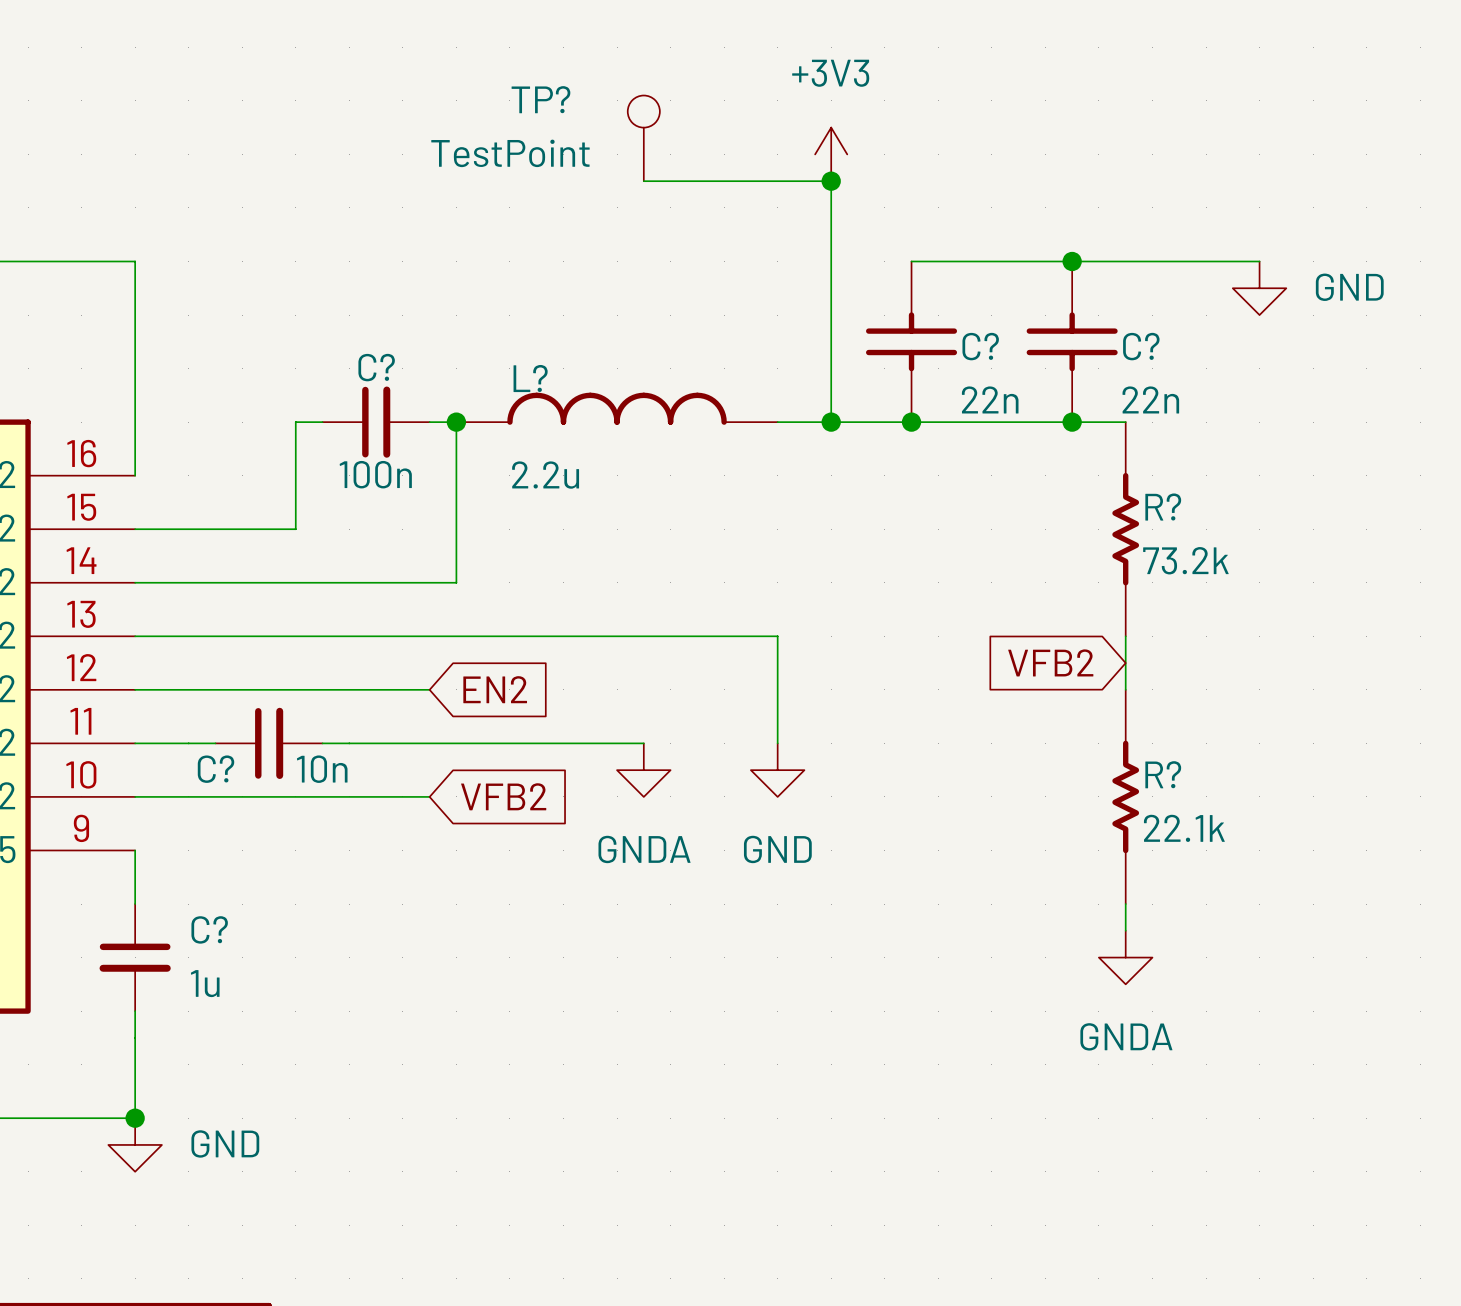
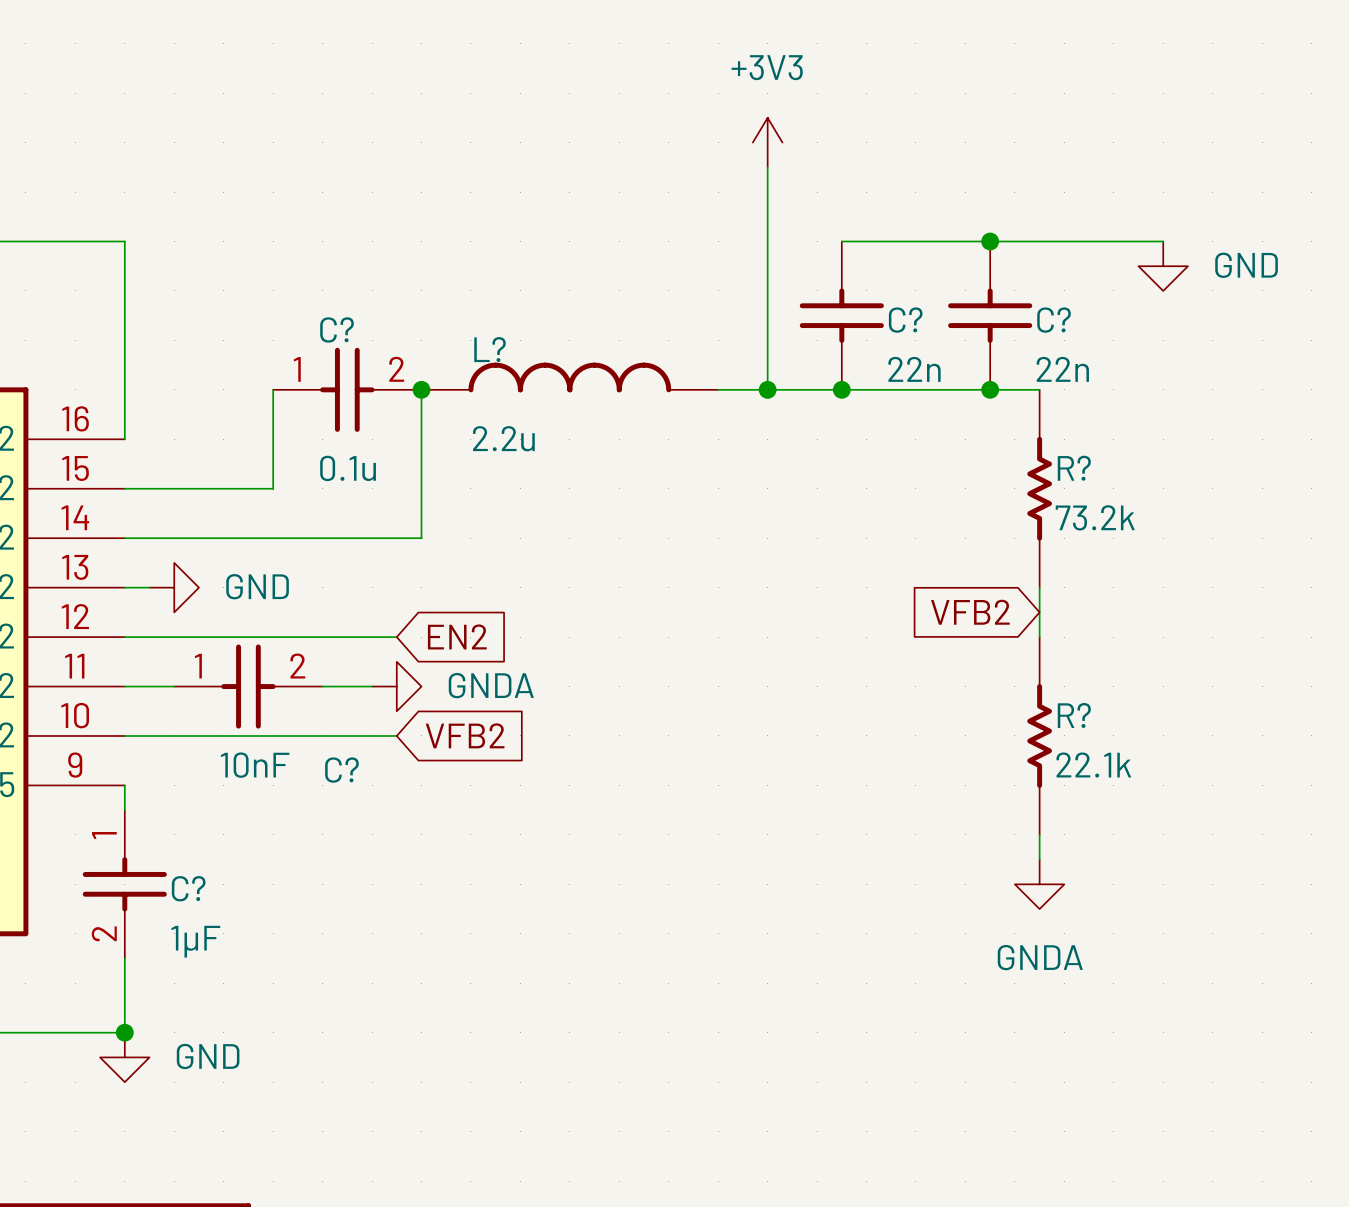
TP?: TestPoint (643, 138) -> none
wire: (643, 181) (831, 181) -> none
junction: (831, 181) -> none
C? symbol: [322, 386, 430, 458] -> [273, 347, 422, 432]
C? value: 100n (375, 474) -> none
C? text: none -> 0.1u (348, 468)
wire: (161, 636) (777, 636) (777, 743) -> none
power symbol: none -> GND (174, 587)
C? symbol: [215, 707, 323, 779] -> [174, 644, 323, 729]
wire: (402, 743) (643, 743) -> none
C? name position: C? (216, 769) -> C? (341, 770)
C? value: 10n (322, 769) -> none
power symbol rotation: 0° (643, 770) -> 90° counterclockwise (396, 686)
power symbol position: GNDA (643, 770) -> GNDA (396, 686)
power symbol: GND (777, 770) -> none
C? text: none -> 10nF (255, 765)
C? symbol: [99, 904, 171, 1012] -> [82, 810, 167, 959]
C? value: 1u (205, 983) -> none
C? text: none -> 1µF (195, 941)

